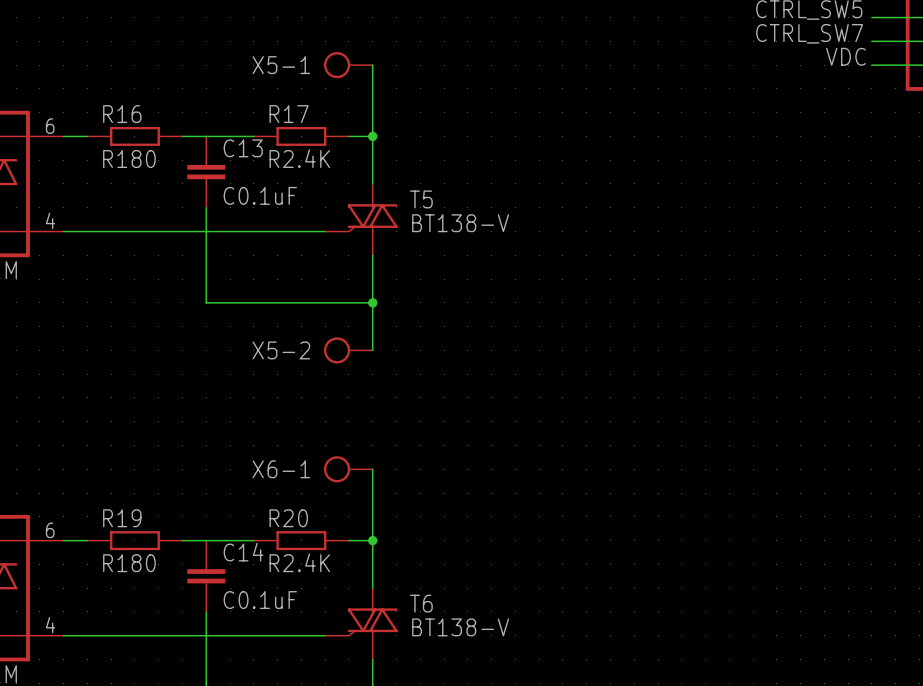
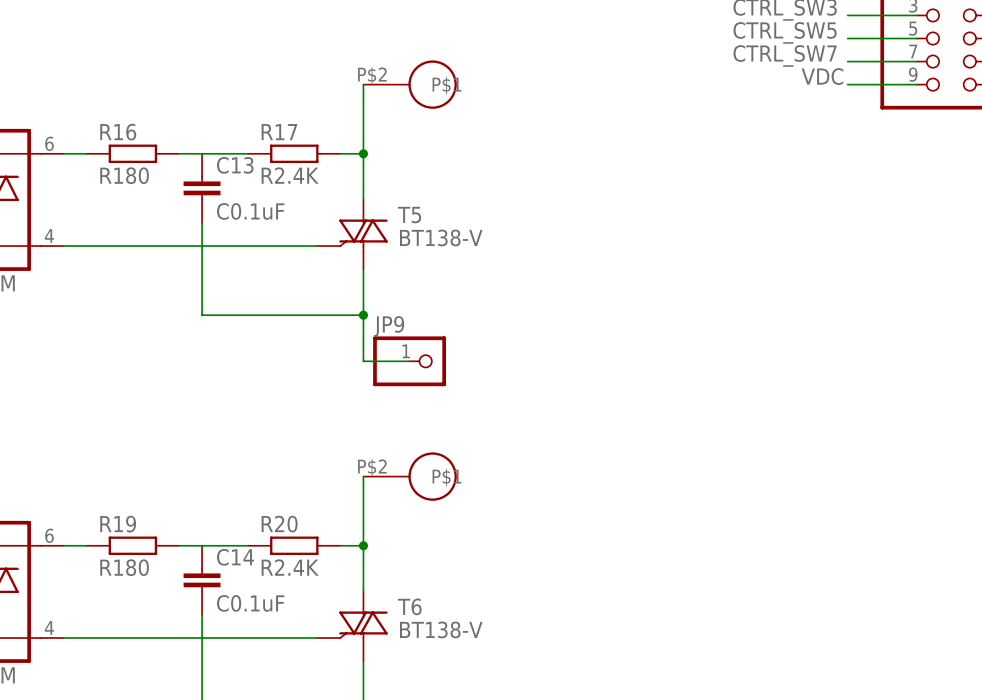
X5-1: (348, 65) -> none
part: none -> (410, 84)
X5-2: (348, 350) -> none
wire: none -> (363, 361) (409, 361)
JP9: none -> (409, 361)
X6-1: (348, 469) -> none
part: none -> (410, 476)

